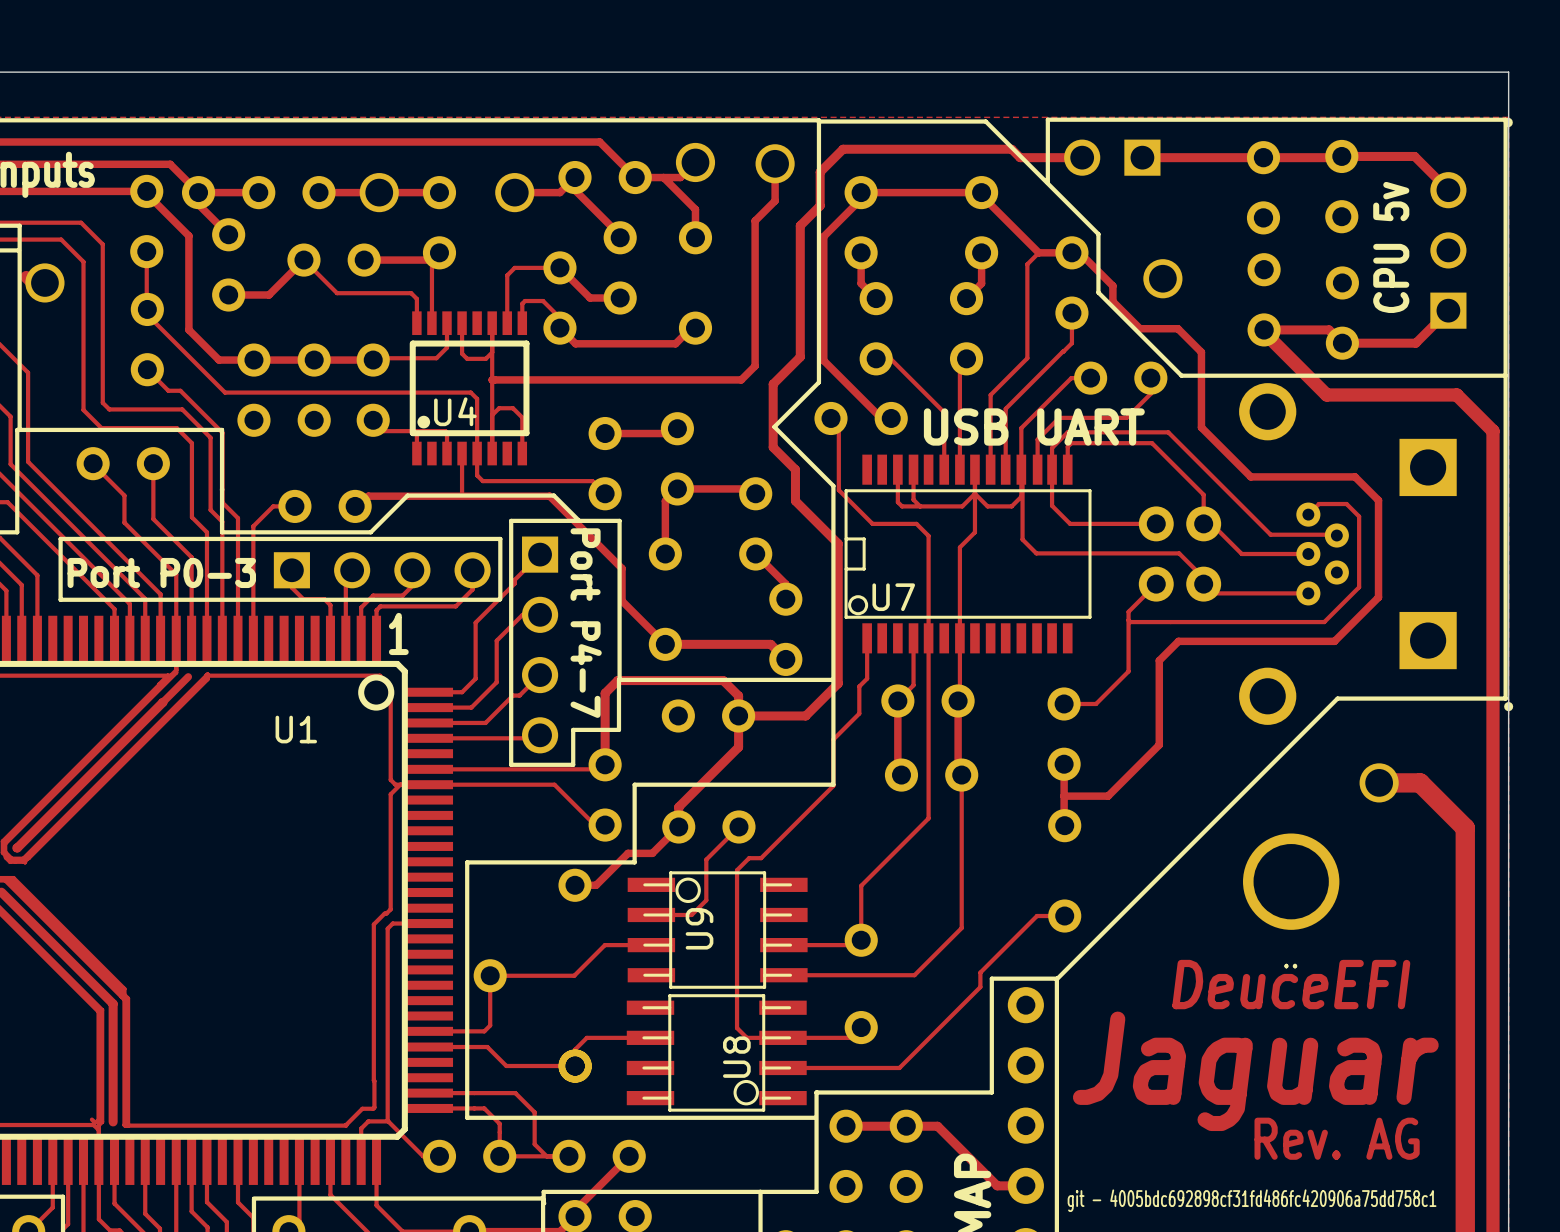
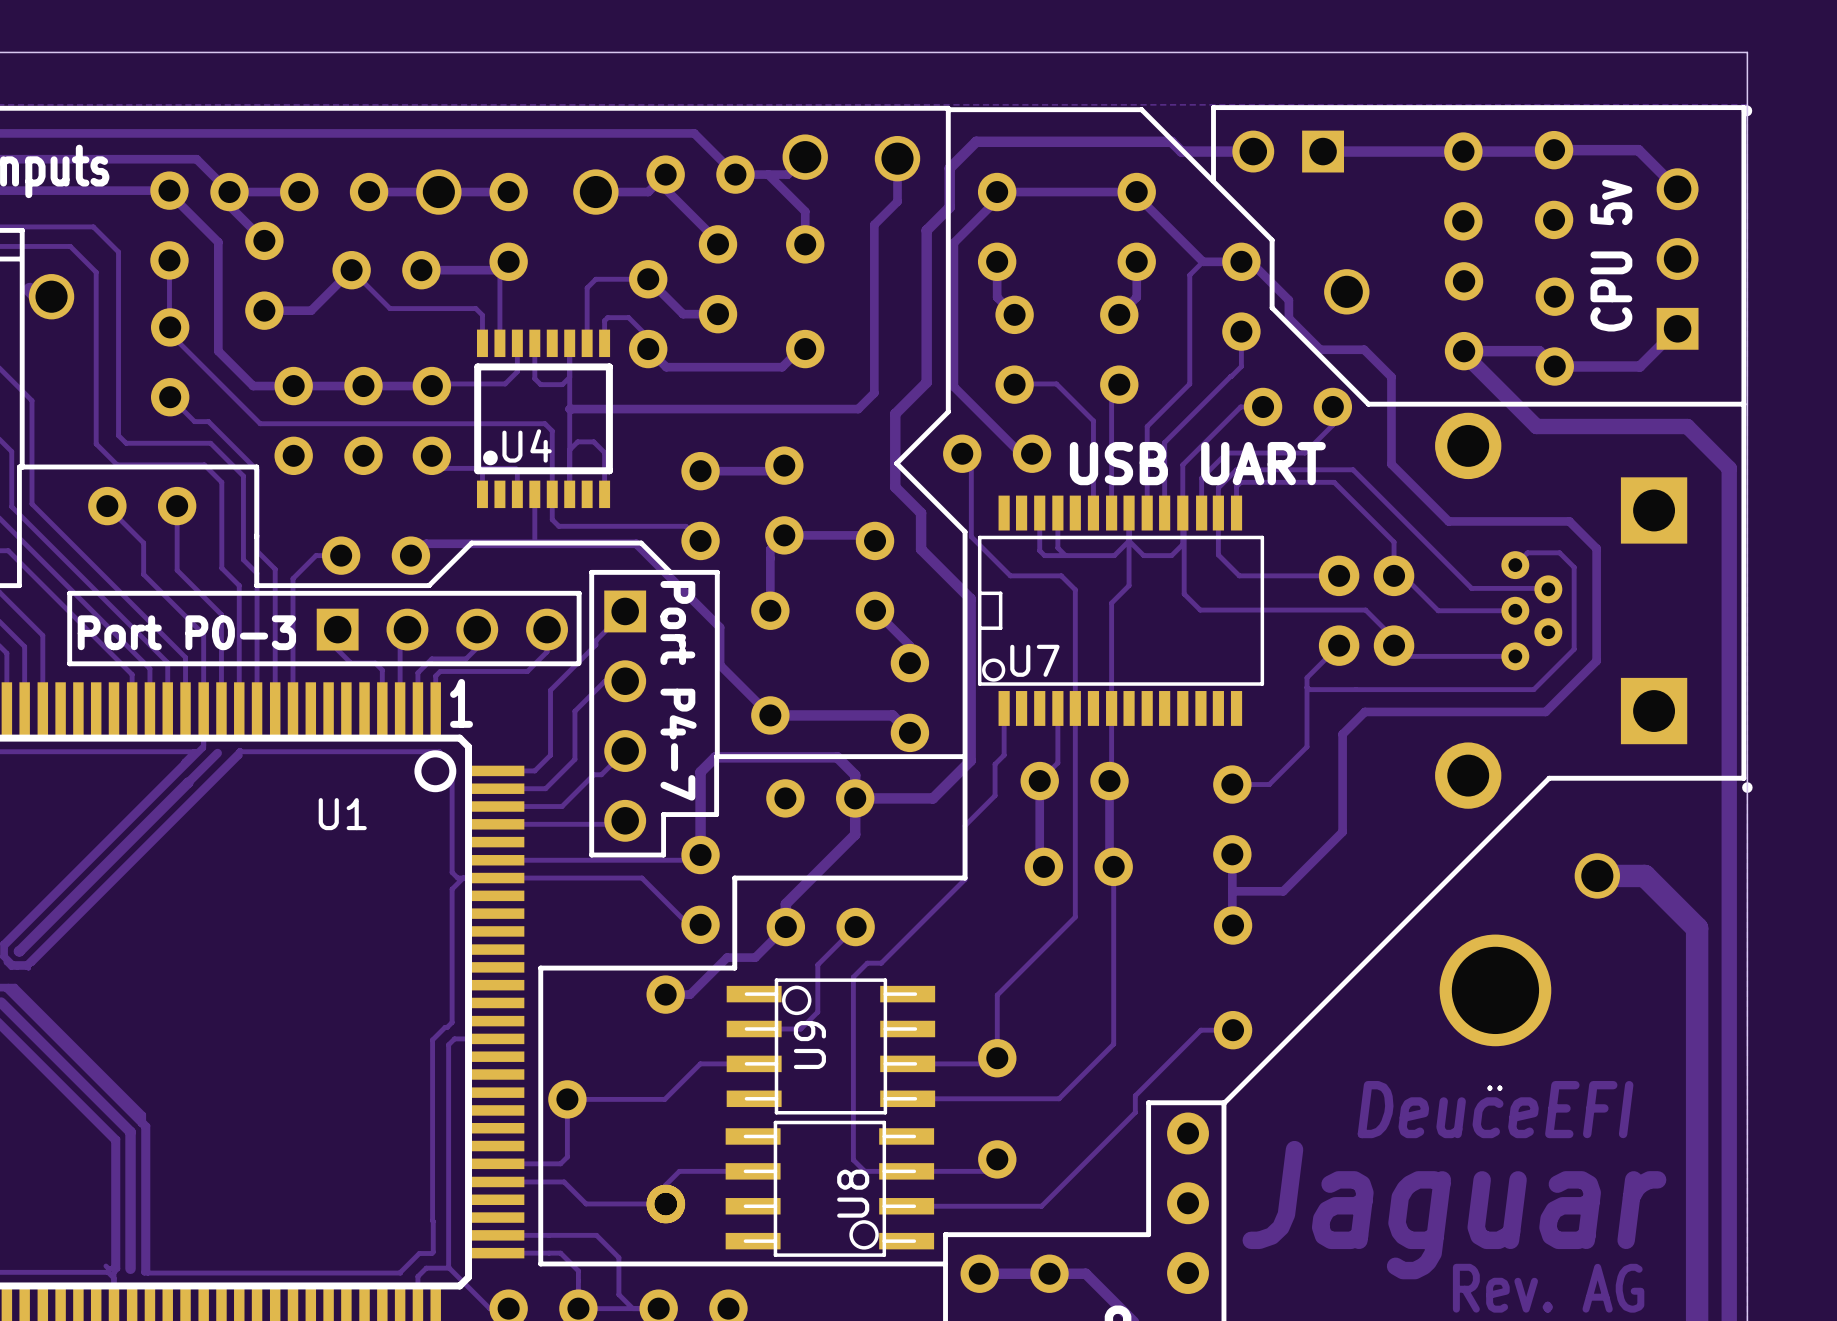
track: (876, 358) (890, 358) (944, 412) -> (1014, 383) (1056, 383) (1093, 420) (1093, 446)

